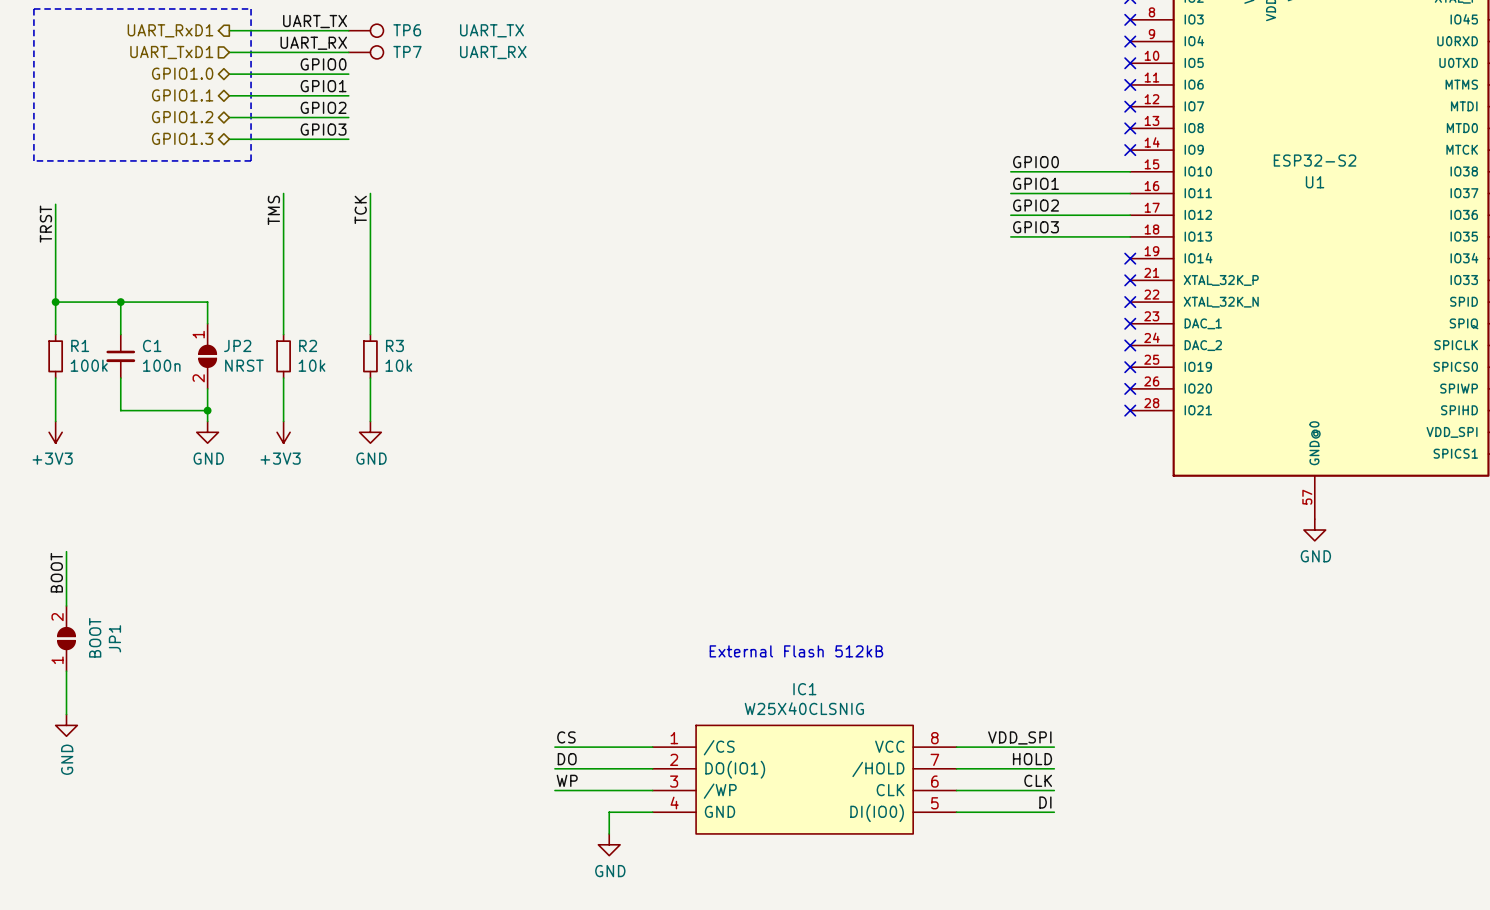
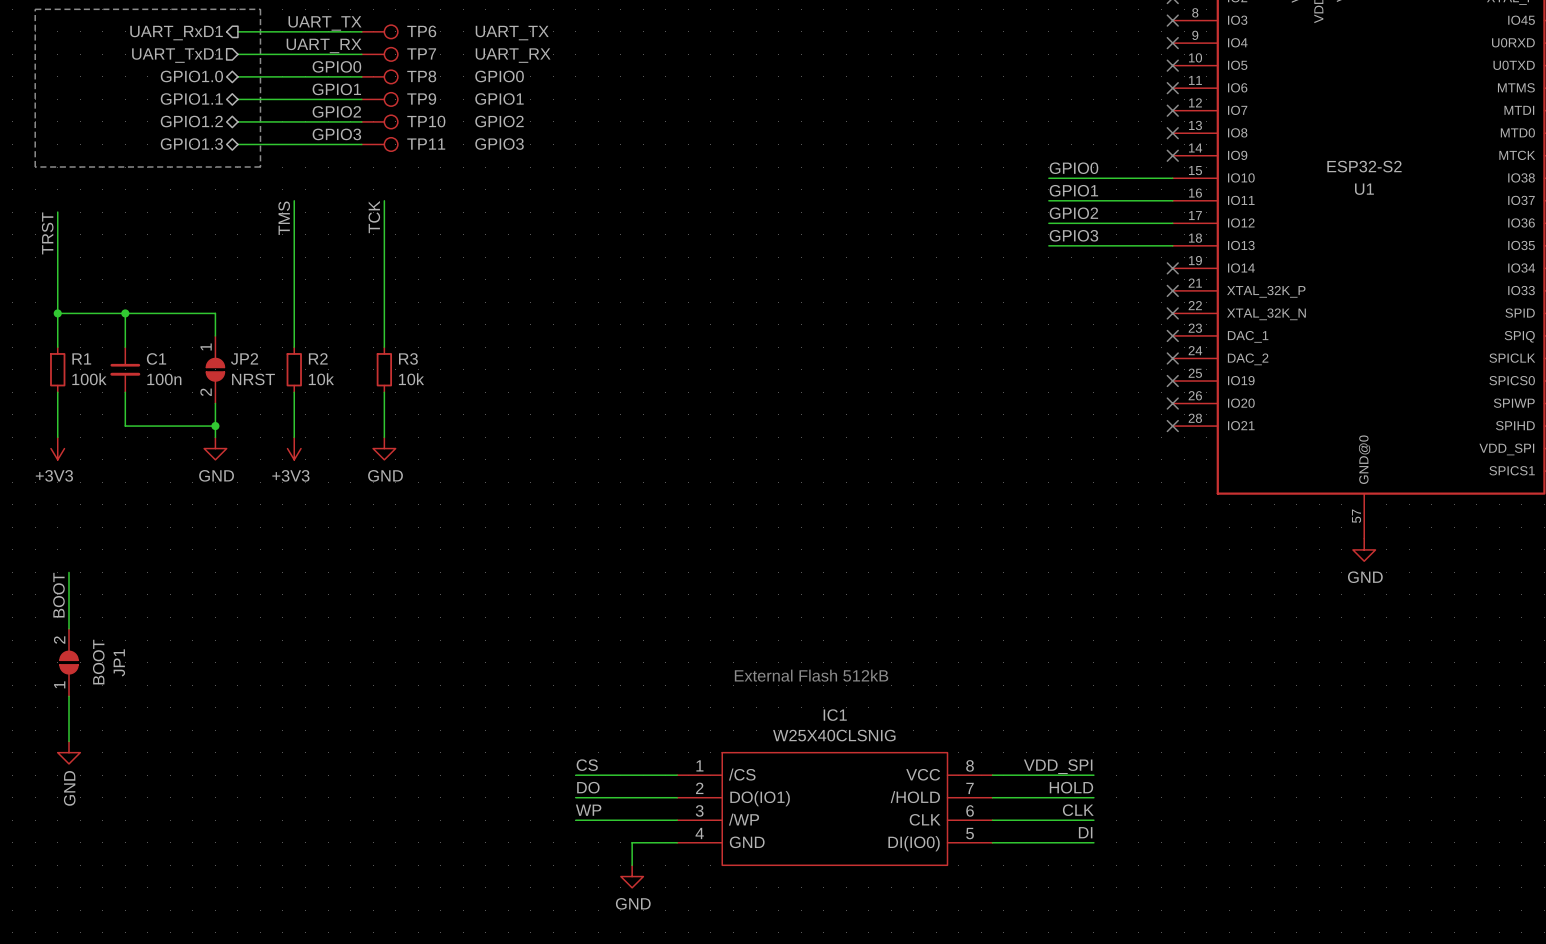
TP8: none -> GPIO0 (379, 76)
TP9: none -> GPIO1 (379, 99)
TP10: none -> GPIO2 (379, 121)
TP11: none -> GPIO3 (379, 144)

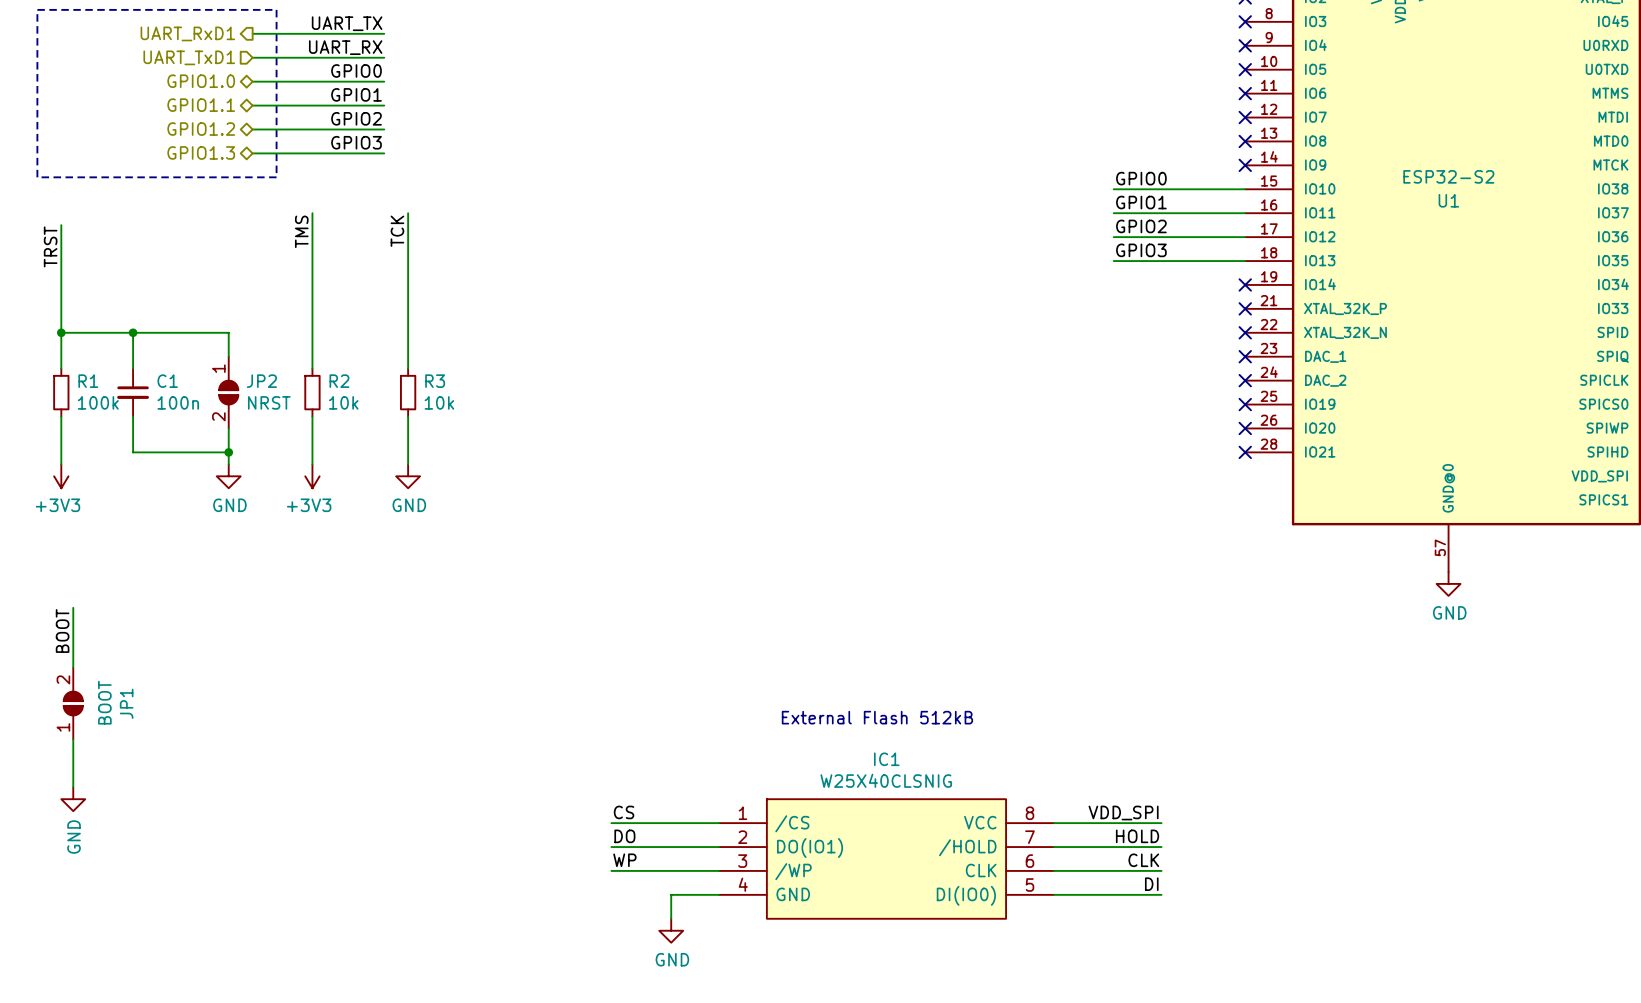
TP6: UART_TX (379, 31) -> none
TP7: UART_RX (379, 54) -> none
TP8: GPIO0 (379, 76) -> none
TP9: GPIO1 (379, 99) -> none
TP10: GPIO2 (379, 121) -> none
TP11: GPIO3 (379, 144) -> none

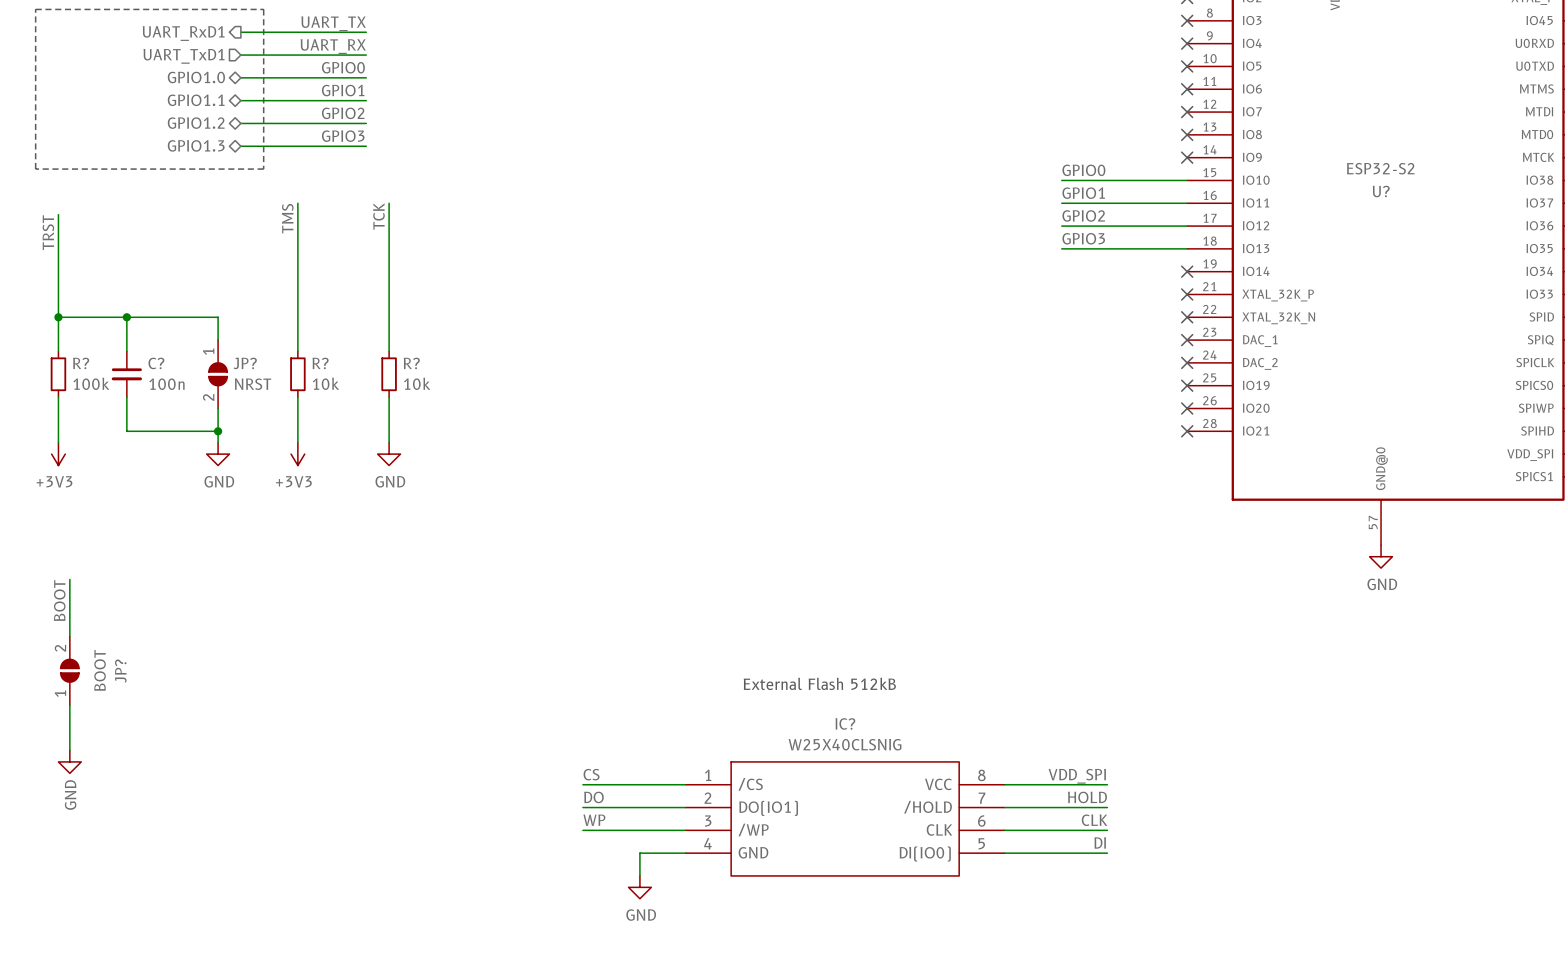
U1 name: U1 (1448, 200) -> U? (1381, 191)
R1 name: R1 (88, 381) -> R? (81, 363)
C1 name: C1 (167, 381) -> C? (156, 363)
JP2 name: JP2 (261, 381) -> JP? (245, 363)
R2 name: R2 (339, 381) -> R? (320, 363)
R3 name: R3 (435, 381) -> R? (411, 363)
JP1 name: JP1 (126, 703) -> JP? (120, 671)
IC1 name: IC1 (886, 759) -> IC? (845, 723)

